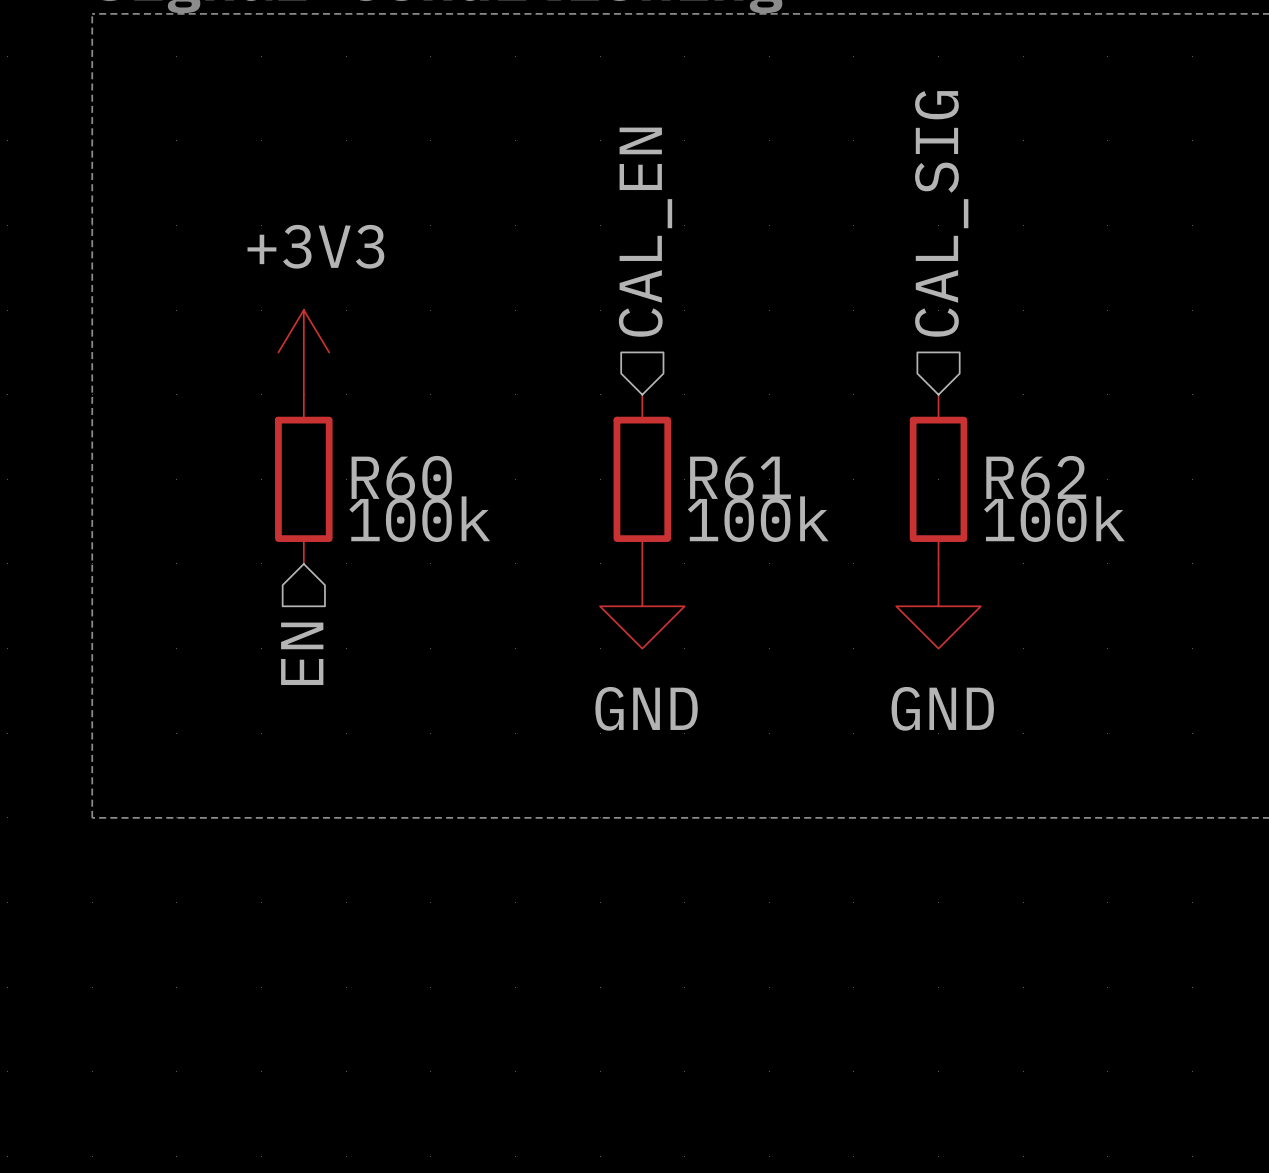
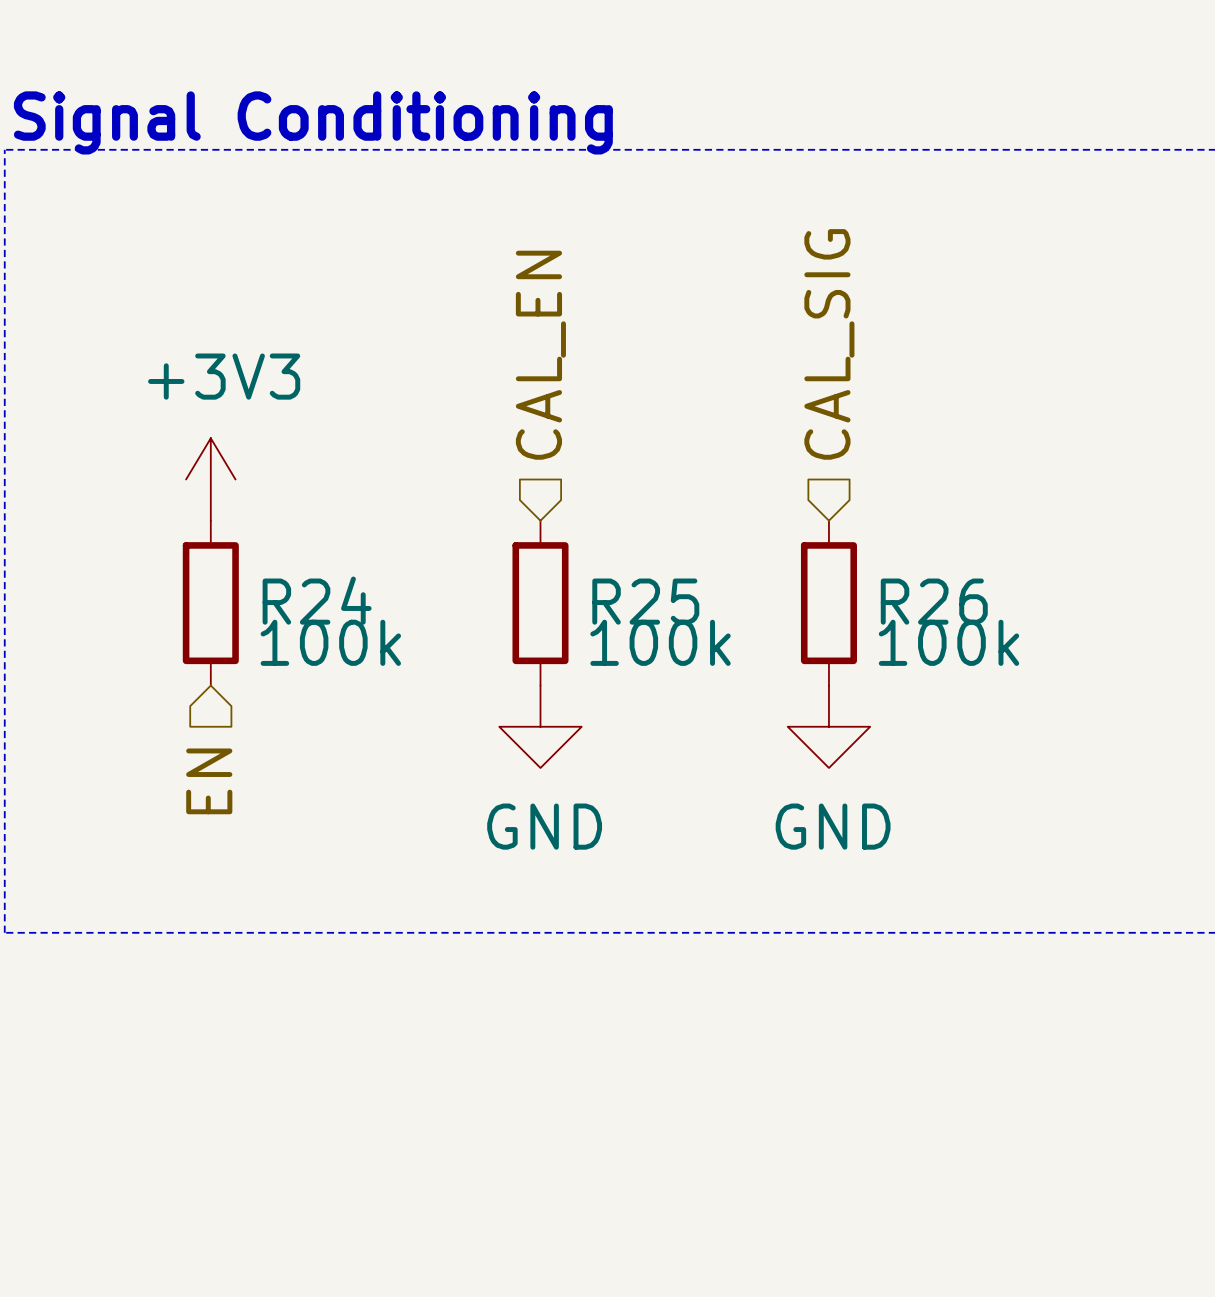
R60 name: R60 (401, 477) -> R24 (317, 600)
R62 name: R62 (1036, 477) -> R26 (934, 601)
R61 name: R61 (740, 478) -> R25 (645, 601)

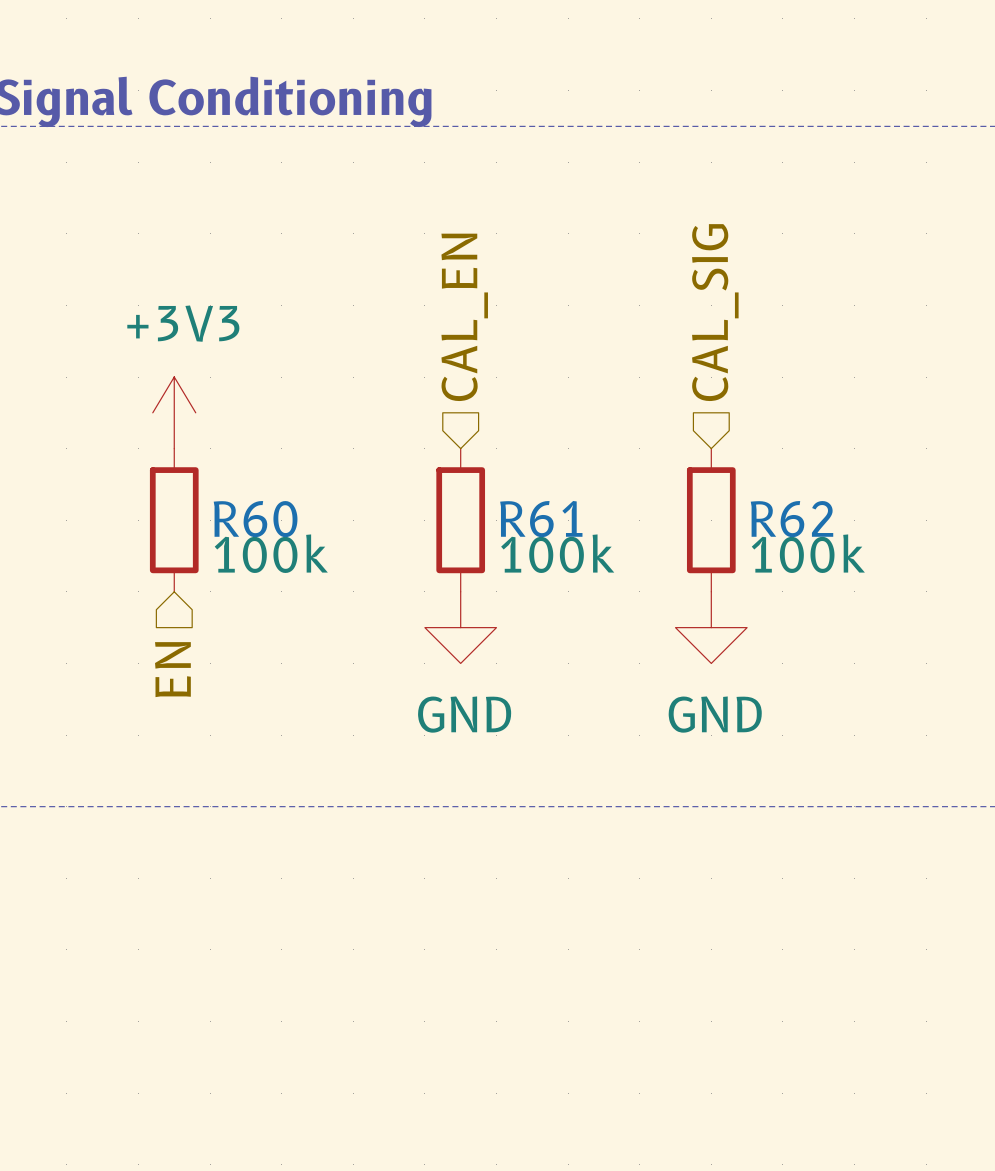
R24 name: R24 (317, 600) -> R60 (255, 519)
R25 name: R25 (645, 601) -> R61 (541, 519)
R26 name: R26 (934, 601) -> R62 (792, 519)

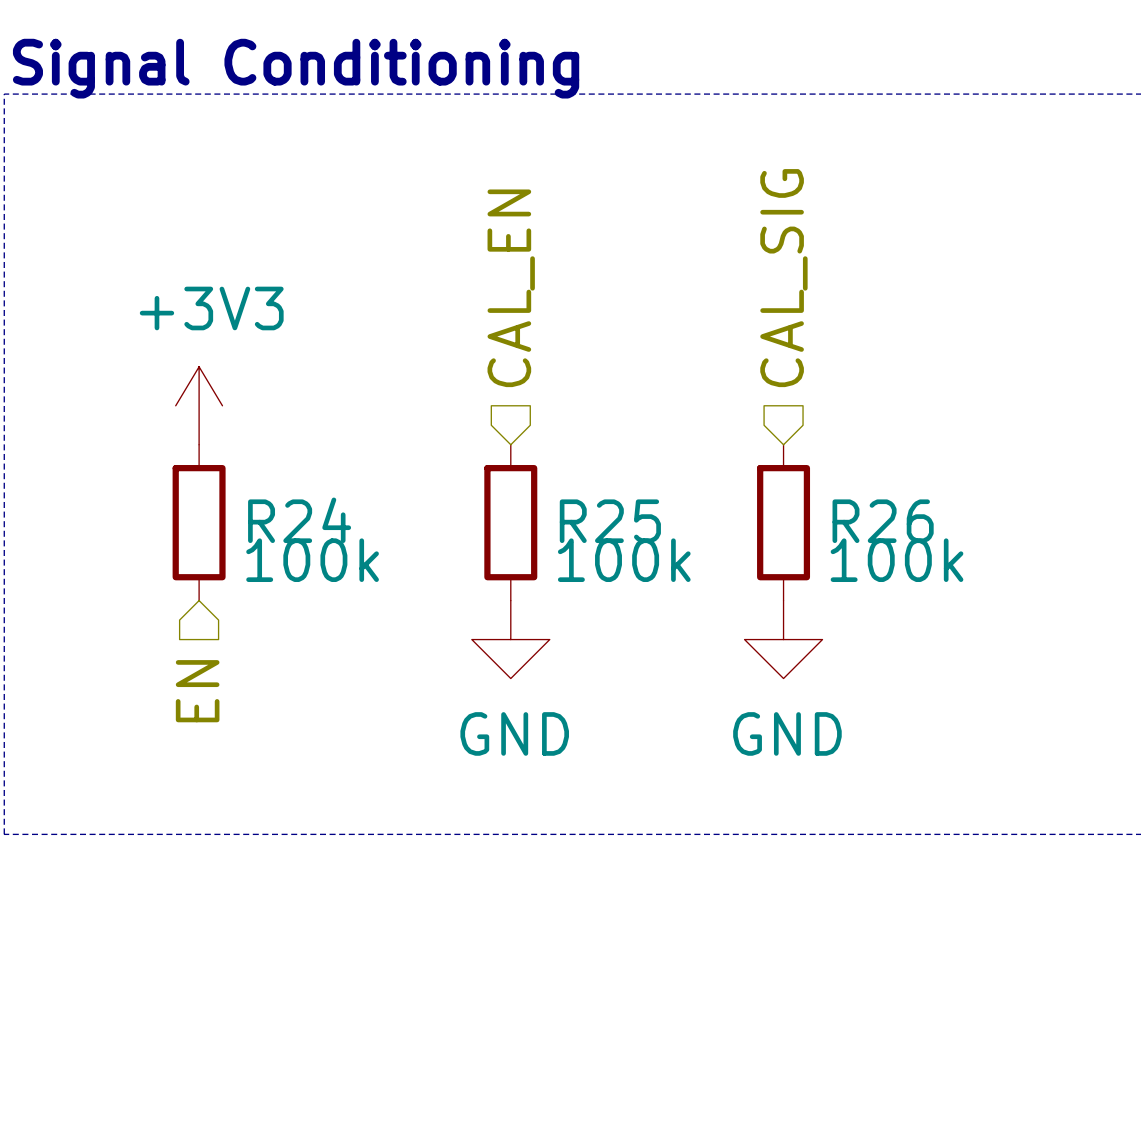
R60 name: R60 (255, 519) -> R24 (299, 520)
R61 name: R61 (541, 519) -> R25 (610, 521)
R62 name: R62 (792, 519) -> R26 (883, 521)

